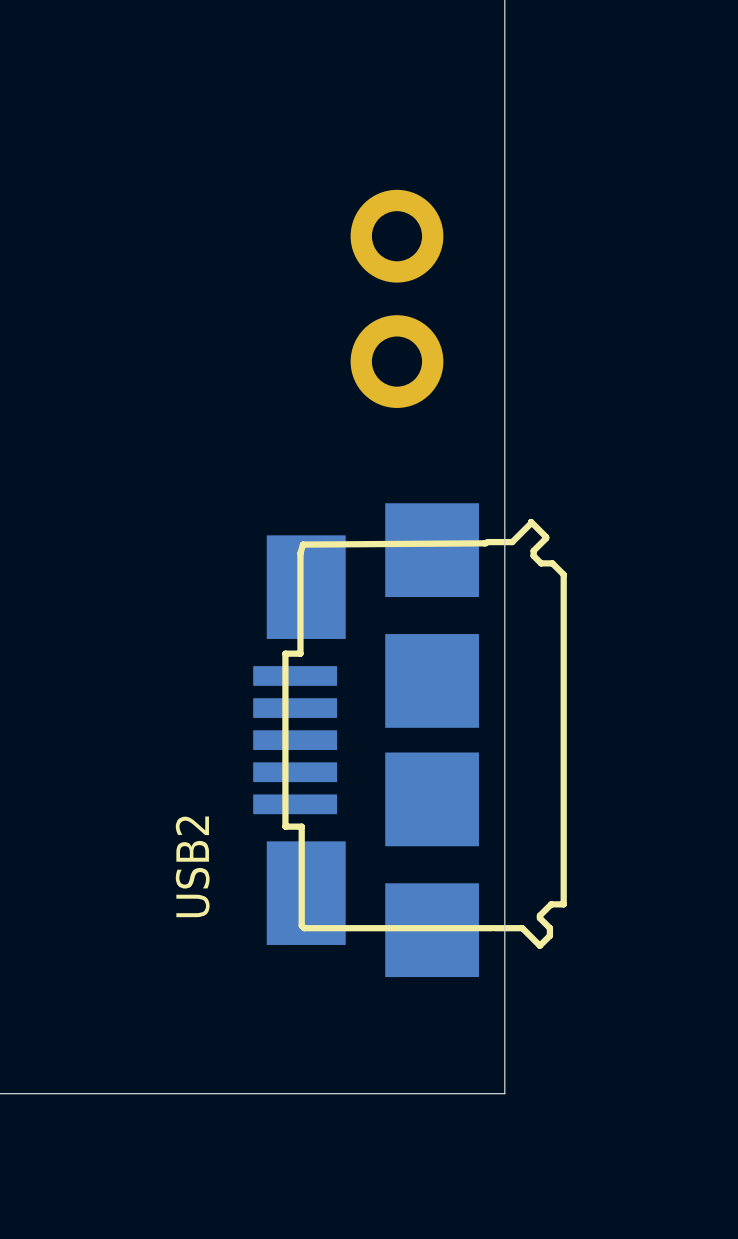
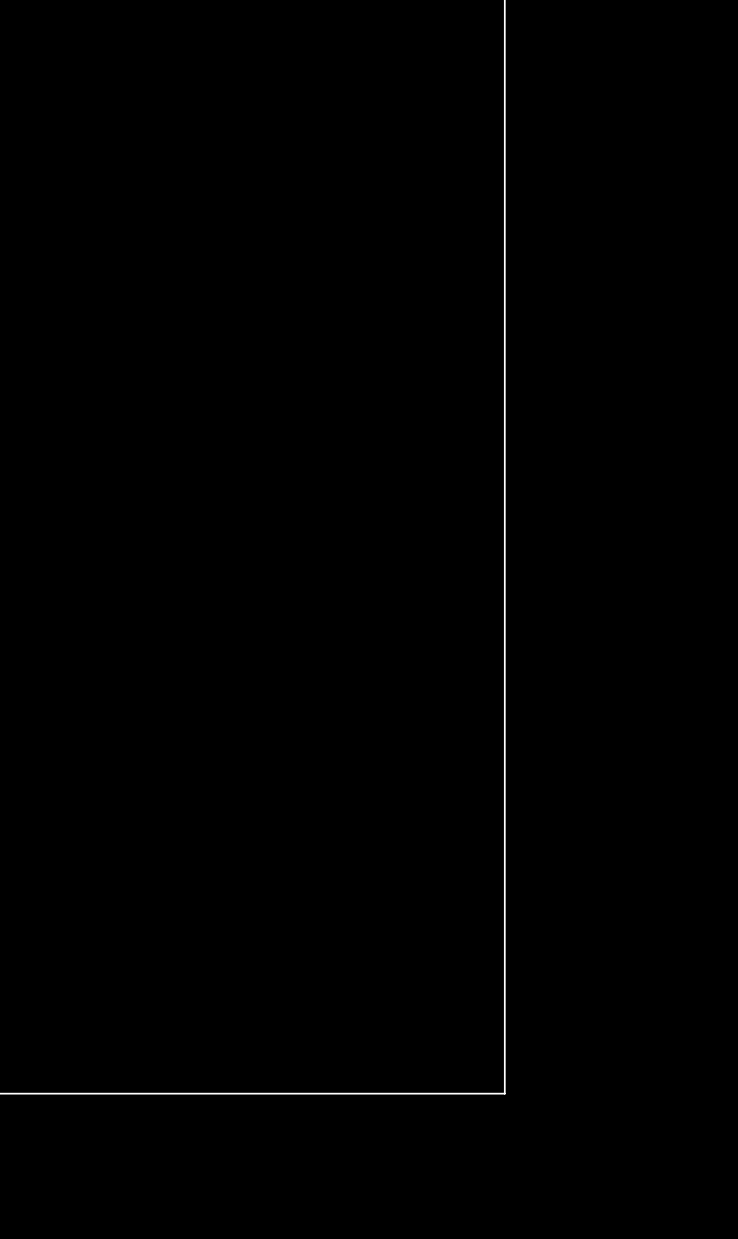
part: (396, 298) -> none
USB2: (410, 740) -> none

